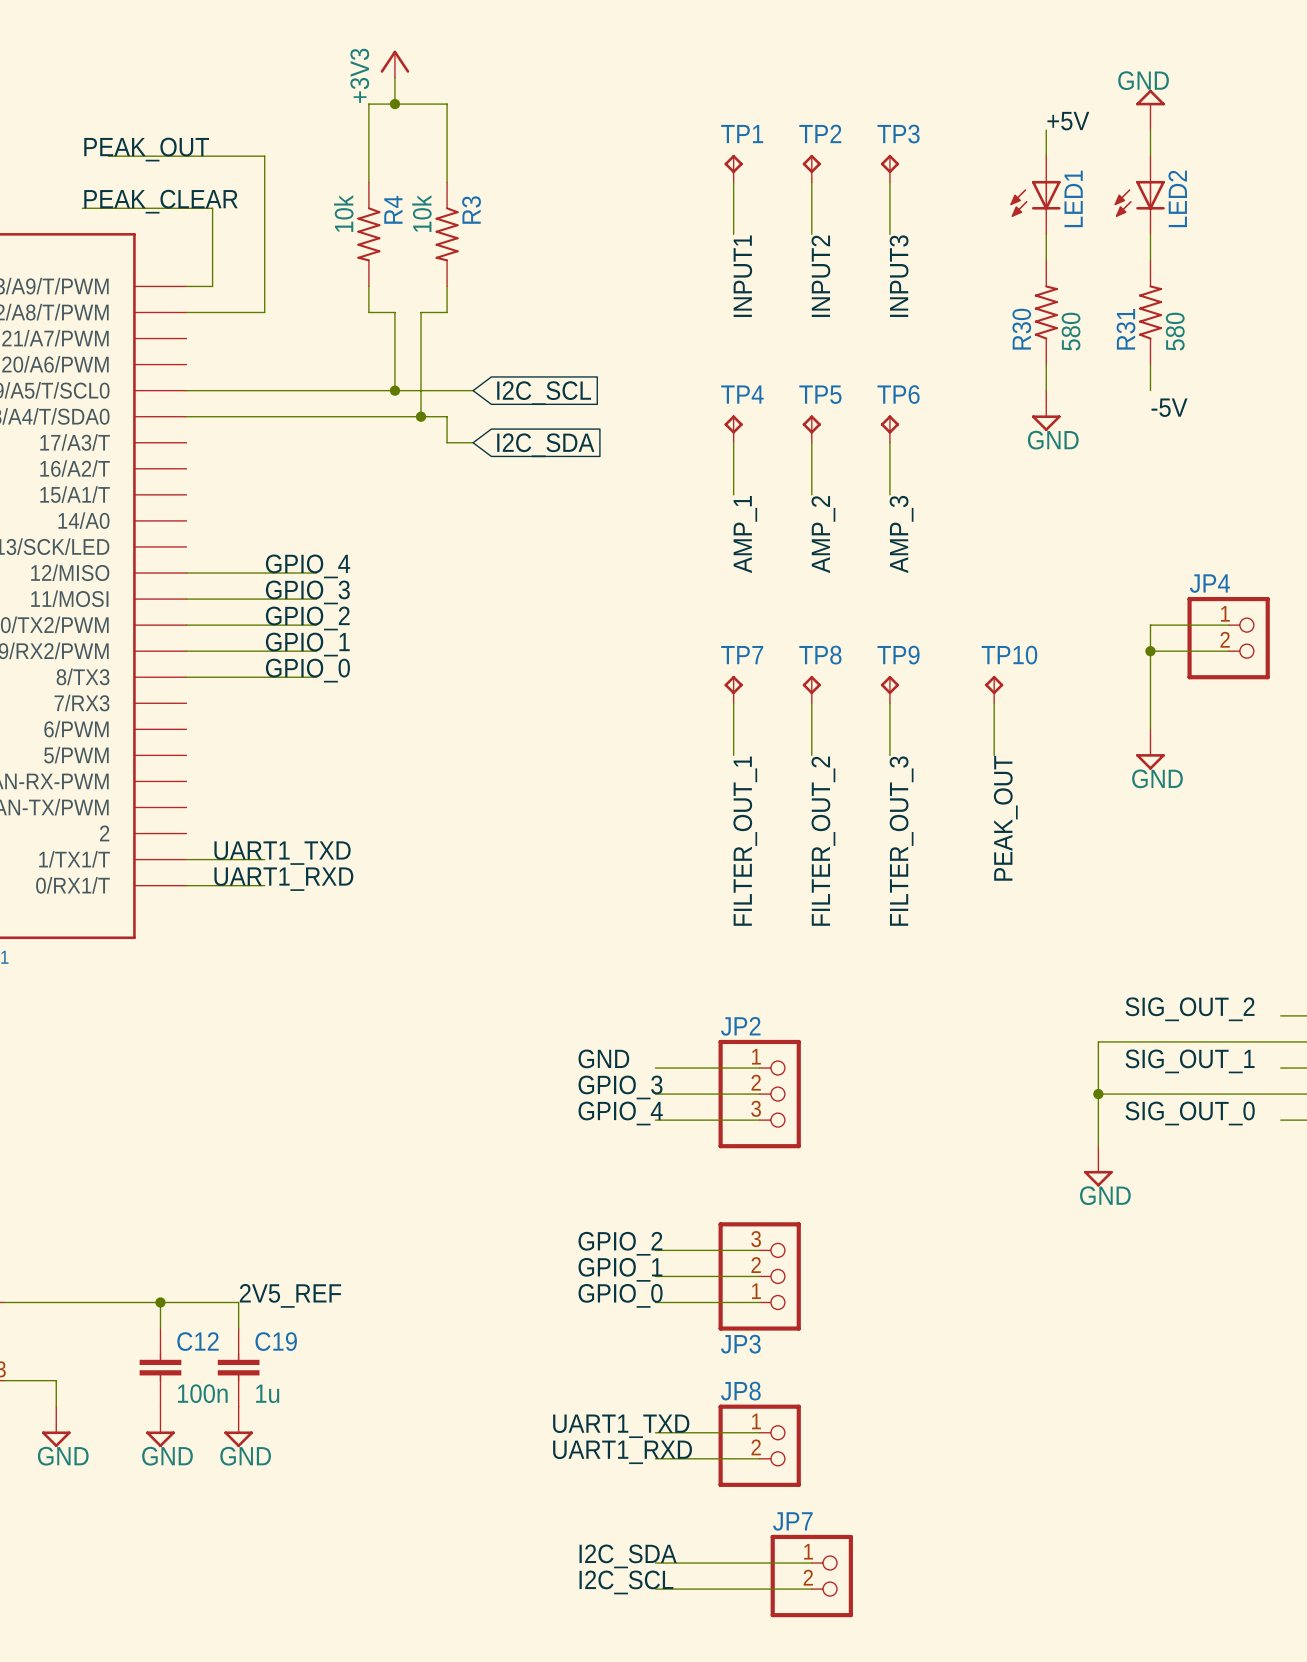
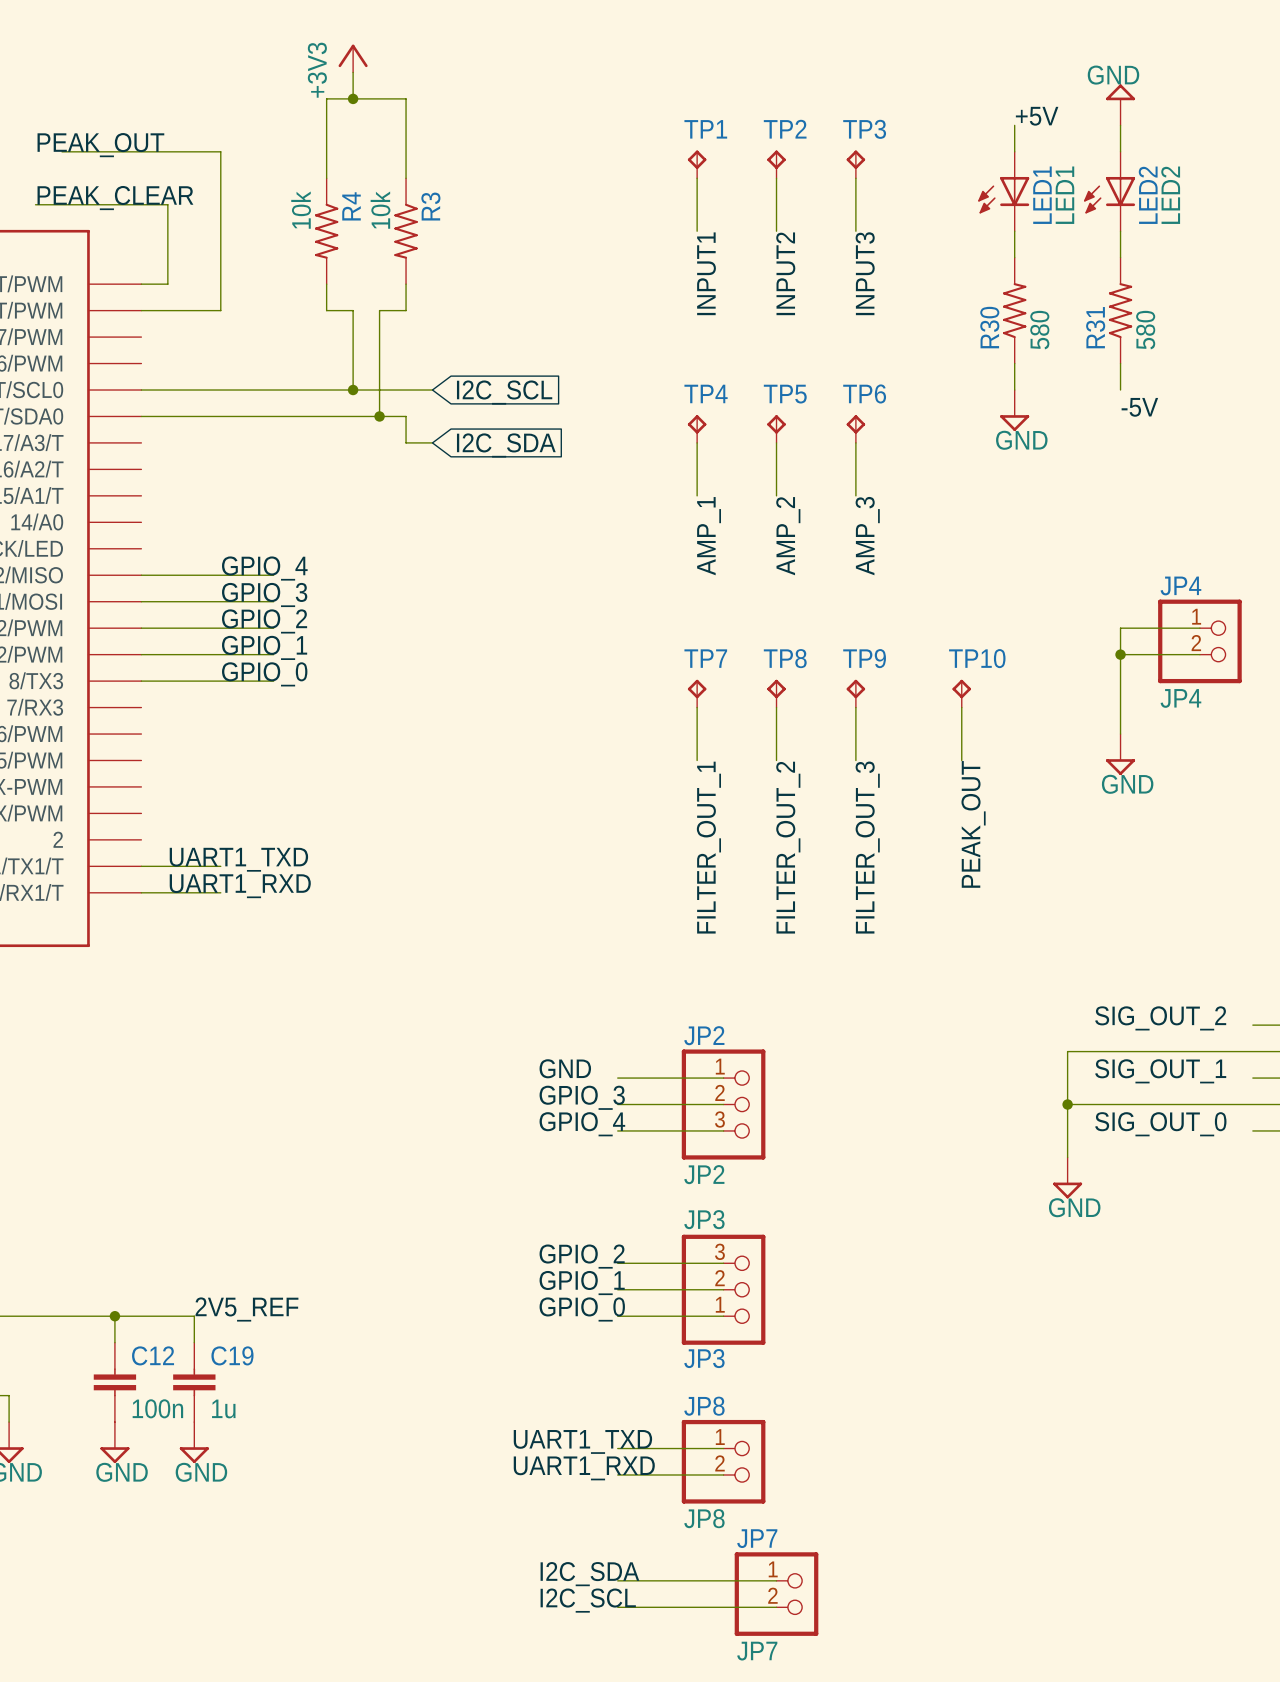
LED1 value: none -> LED1 (1064, 195)
LED2 value: none -> LED2 (1170, 195)
JP4 value: none -> JP4 (1180, 698)
JP2 value: none -> JP2 (704, 1174)
JP3 value: none -> JP3 (704, 1219)
JP8 value: none -> JP8 (704, 1518)
JP7 value: none -> JP7 (757, 1651)

